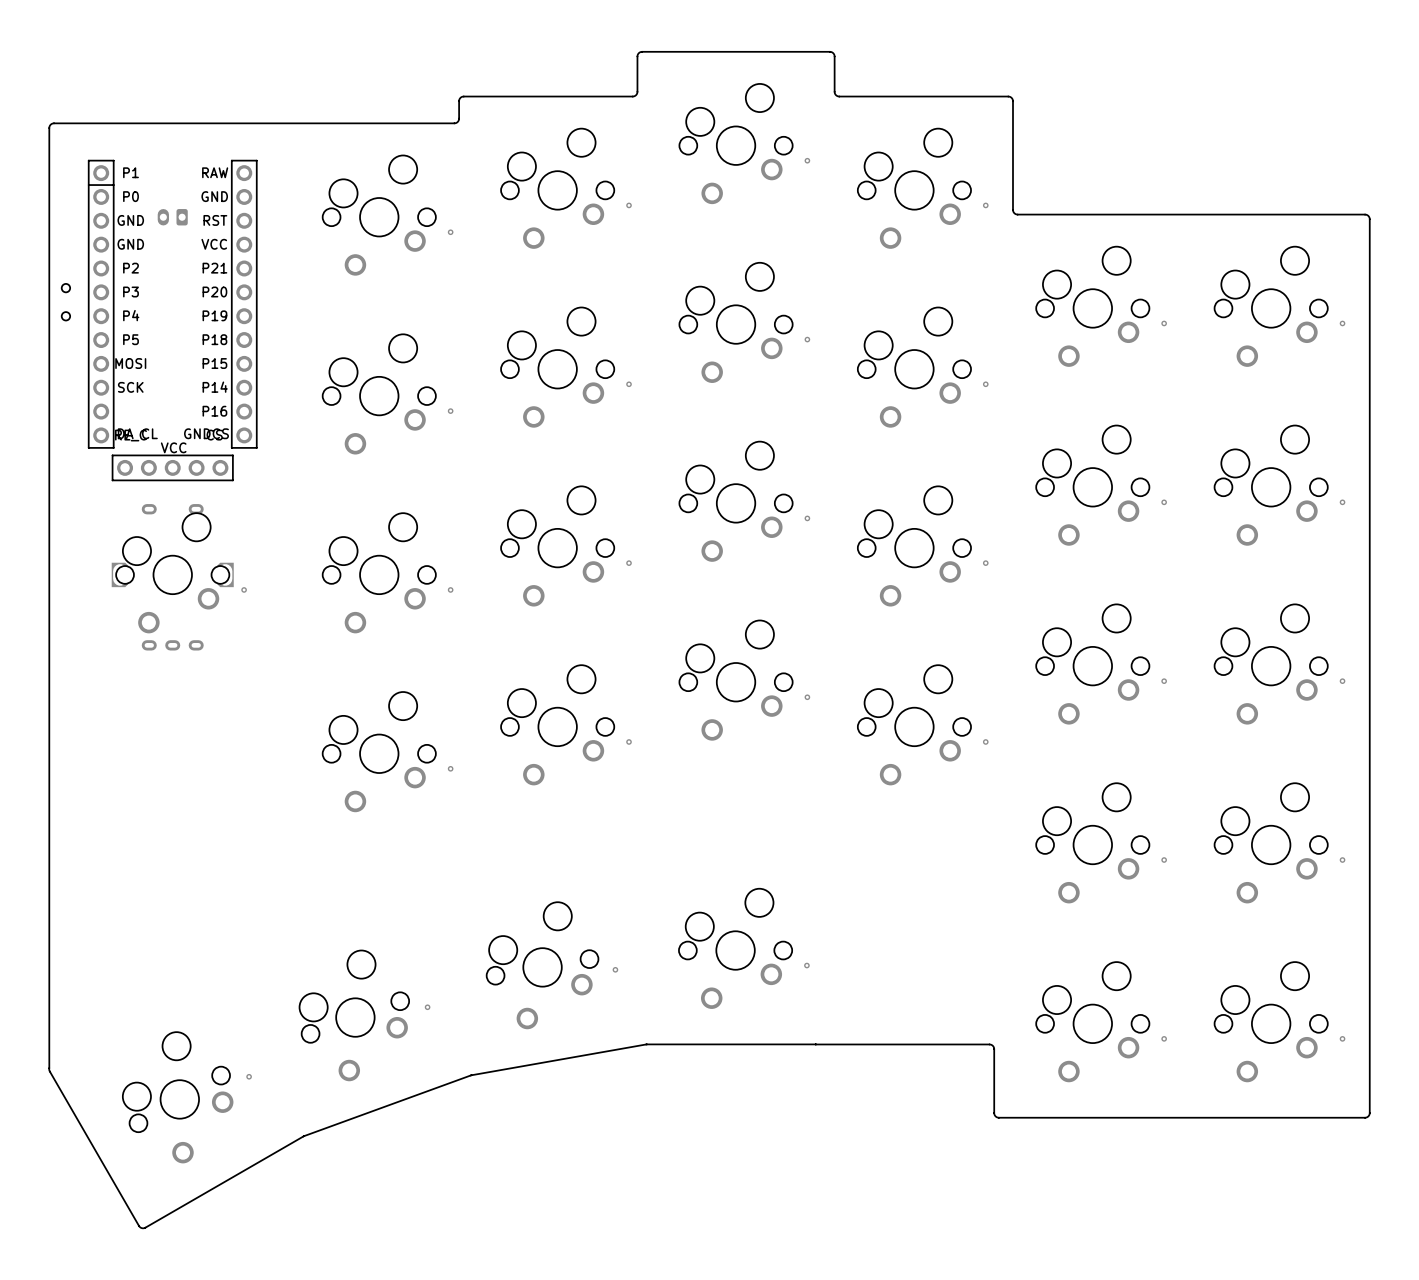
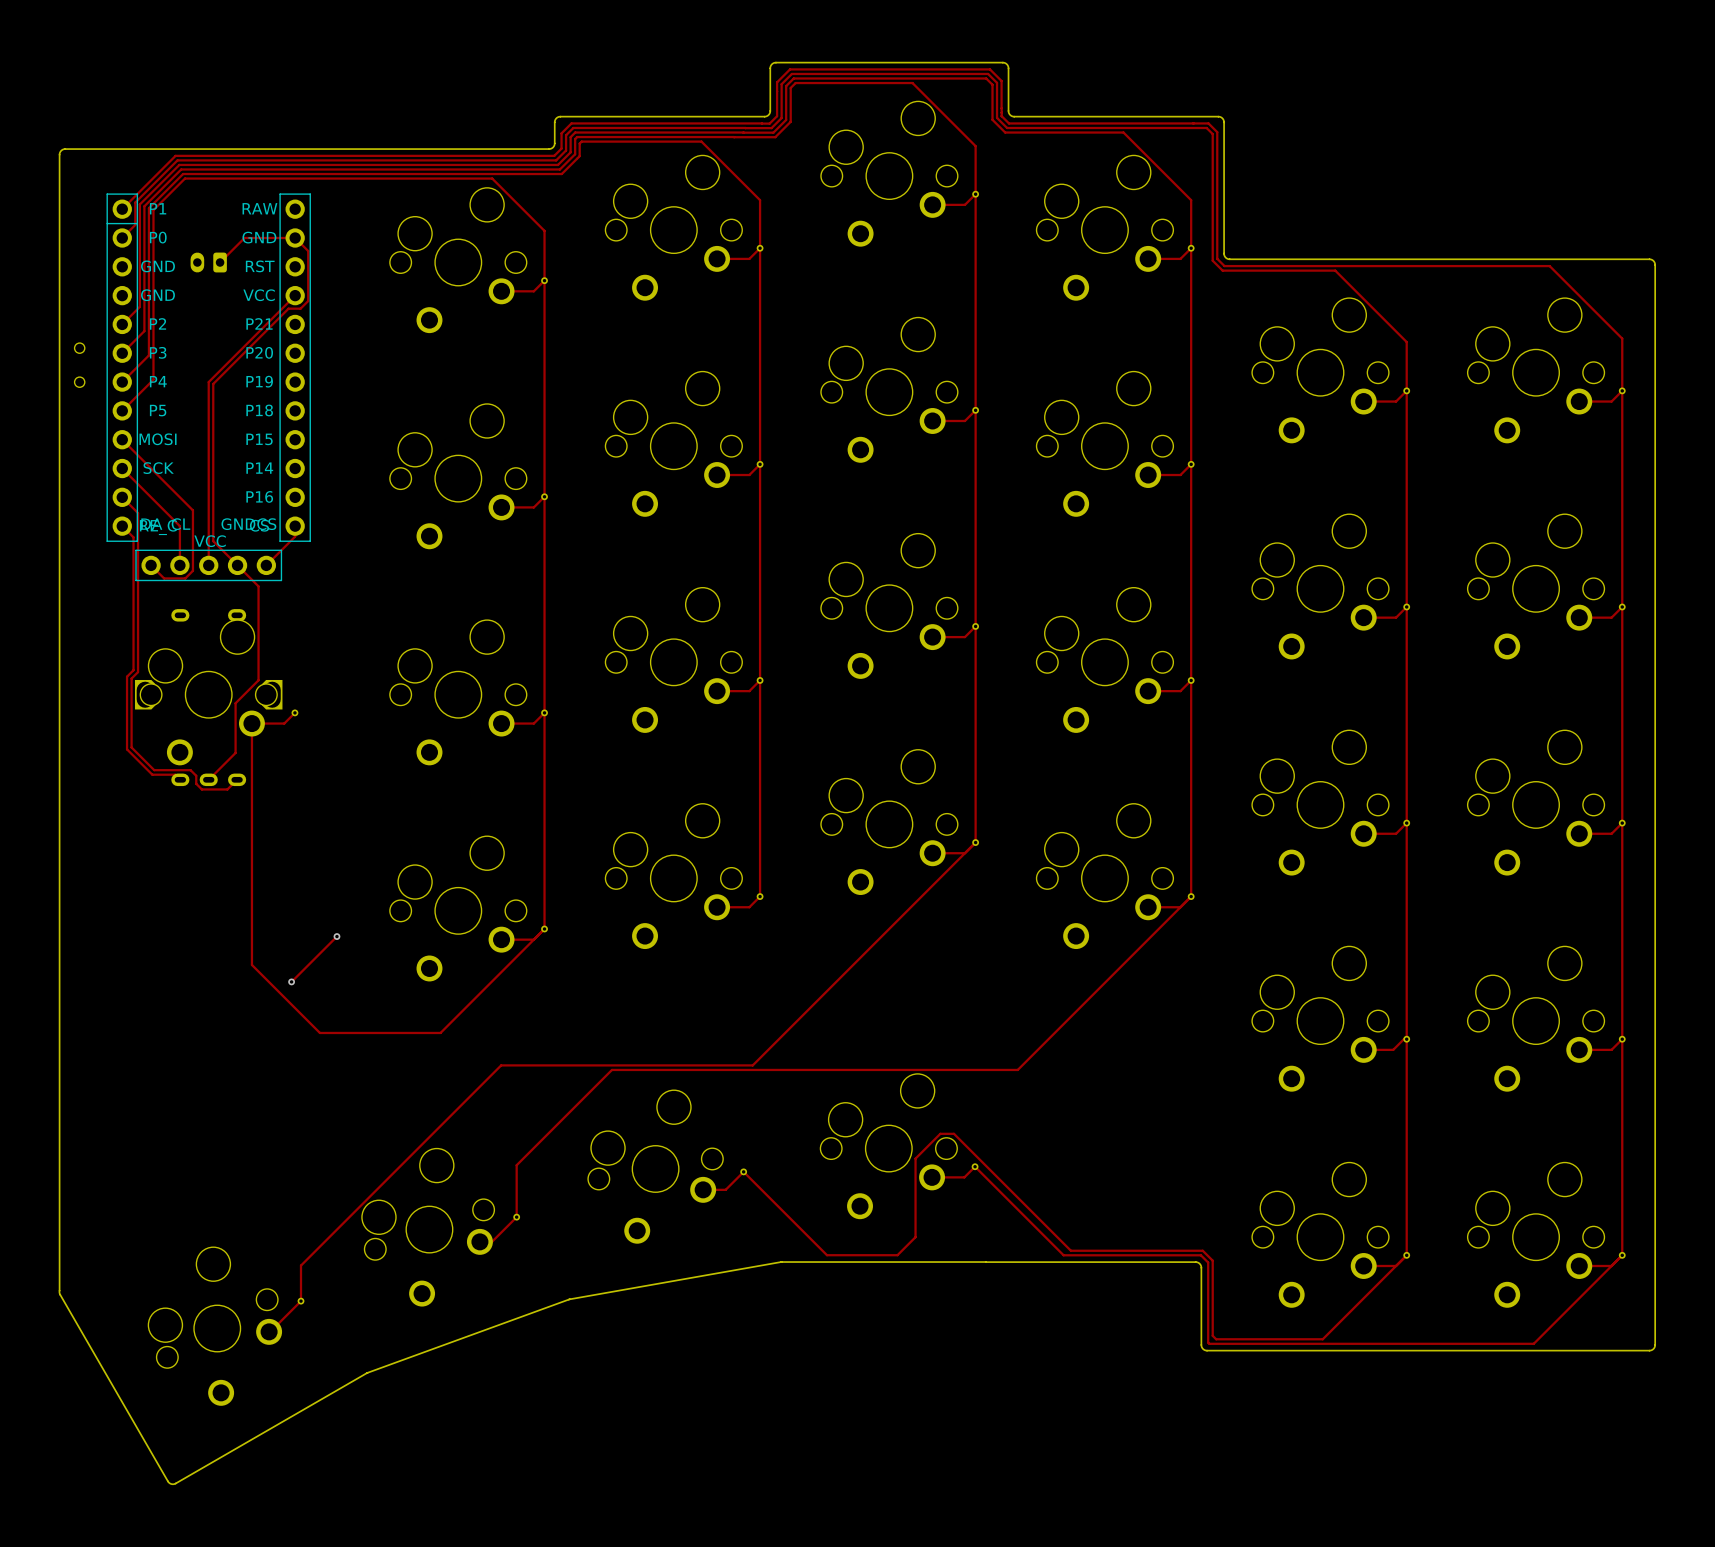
track: none -> (1001, 116) (1008, 123) (1208, 123) (1217, 132) (1217, 258) (1224, 266) (1549, 266) (1622, 338) (1622, 1255) (1533, 1343) (1209, 1343) (1208, 1262) (1200, 1255) (1063, 1255) (975, 1166) (964, 1177) (932, 1177)
track: none -> (1001, 116) (1001, 80) (990, 69) (790, 69) (777, 82) (777, 116) (769, 123) (761, 123)
track: none -> (761, 123) (571, 123) (561, 133) (561, 148) (554, 155) (175, 155) (122, 209)
track: none -> (745, 127) (573, 127) (566, 135) (566, 150) (556, 160) (177, 160) (135, 202) (135, 224) (122, 238)
track: none -> (745, 128) (771, 128) (781, 118) (781, 84) (791, 73) (988, 73) (997, 82) (997, 117) (1007, 127) (1206, 127) (1212, 134) (1212, 260) (1222, 270) (1335, 270) (1406, 342) (1406, 1255) (1322, 1339) (1216, 1339) (1212, 1335) (1212, 1260) (1202, 1250) (1070, 1250) (953, 1133) (940, 1133) (915, 1158) (915, 1237) (897, 1255) (826, 1255) (743, 1171) (725, 1189) (703, 1189)
track: none -> (743, 132) (575, 132) (570, 137) (570, 152) (558, 164) (179, 164) (139, 204) (139, 306) (122, 324)
track: none -> (743, 132) (773, 132) (786, 119) (786, 86) (793, 78) (986, 78) (992, 84) (992, 119) (1005, 132) (1123, 132) (1191, 200) (1191, 896) (1017, 1069) (611, 1069) (516, 1165) (516, 1217) (491, 1241) (479, 1241)
track: none -> (734, 137) (577, 137) (575, 139) (575, 154) (559, 169) (181, 169) (144, 206) (144, 331) (122, 353)
track: none -> (734, 137) (775, 137) (790, 121) (790, 87) (795, 83) (912, 83) (975, 146) (975, 842) (752, 1065) (501, 1065) (301, 1265) (301, 1301) (269, 1331)
track: none -> (975, 194) (964, 204) (932, 204)
track: none -> (760, 248) (749, 258) (717, 258)
track: none -> (1191, 248) (1180, 258) (1148, 258)
track: none -> (220, 262) (244, 238) (295, 238) (308, 251) (308, 301) (300, 308) (288, 308) (213, 383) (213, 541) (258, 586) (258, 680) (235, 703) (235, 752) (208, 779)
track: none -> (544, 280) (533, 291) (501, 291)
track: none -> (295, 295) (208, 382) (208, 565)
track: none -> (122, 382) (148, 355) (148, 208) (183, 174) (561, 174) (579, 156) (579, 143) (581, 141) (701, 141) (760, 200) (760, 896) (749, 907) (717, 907)
track: none -> (1406, 390) (1396, 401) (1363, 401)
track: none -> (1622, 390) (1611, 401) (1579, 401)
track: none -> (975, 410) (964, 420) (932, 420)
track: none -> (122, 410) (153, 379) (153, 210) (185, 178) (492, 178) (544, 230) (544, 929) (440, 1032) (319, 1032) (251, 964) (251, 723) (284, 723) (294, 712)
track: none -> (122, 439) (192, 510) (192, 570) (185, 578) (164, 578) (151, 565)
track: none -> (760, 464) (749, 475) (717, 475)
track: none -> (1191, 464) (1180, 475) (1148, 475)
track: none -> (122, 468) (179, 526) (179, 565)
track: none -> (122, 497) (138, 513) (138, 672) (131, 678) (131, 747) (154, 770) (190, 770) (196, 775) (196, 783) (201, 789) (227, 789) (237, 779)
track: none -> (544, 496) (533, 507) (501, 507)
track: none -> (122, 526) (133, 537) (133, 670) (127, 676) (127, 749) (152, 774) (175, 774) (180, 779)
track: none -> (295, 526) (295, 536) (266, 565)
track: none -> (1406, 606) (1396, 617) (1363, 617)
track: none -> (1622, 606) (1611, 617) (1579, 617)
track: none -> (975, 626) (964, 637) (932, 637)
track: none -> (760, 680) (749, 691) (717, 691)
track: none -> (1191, 680) (1180, 691) (1148, 691)
track: none -> (544, 712) (533, 723) (501, 723)
track: none -> (1406, 823) (1396, 833) (1363, 833)
track: none -> (1622, 823) (1611, 833) (1579, 833)
track: none -> (932, 853) (964, 853)
track: none -> (1148, 907) (1180, 907)
track: none -> (336, 936) (291, 981)
via: none -> (336, 936)
track: none -> (501, 939) (533, 939)
via: none -> (291, 981)
track: none -> (1406, 1039) (1403, 1039) (1393, 1049) (1363, 1049)
track: none -> (1622, 1039) (1611, 1049) (1579, 1049)
track: none -> (1363, 1265) (1396, 1265)
track: none -> (1579, 1265) (1611, 1265)

